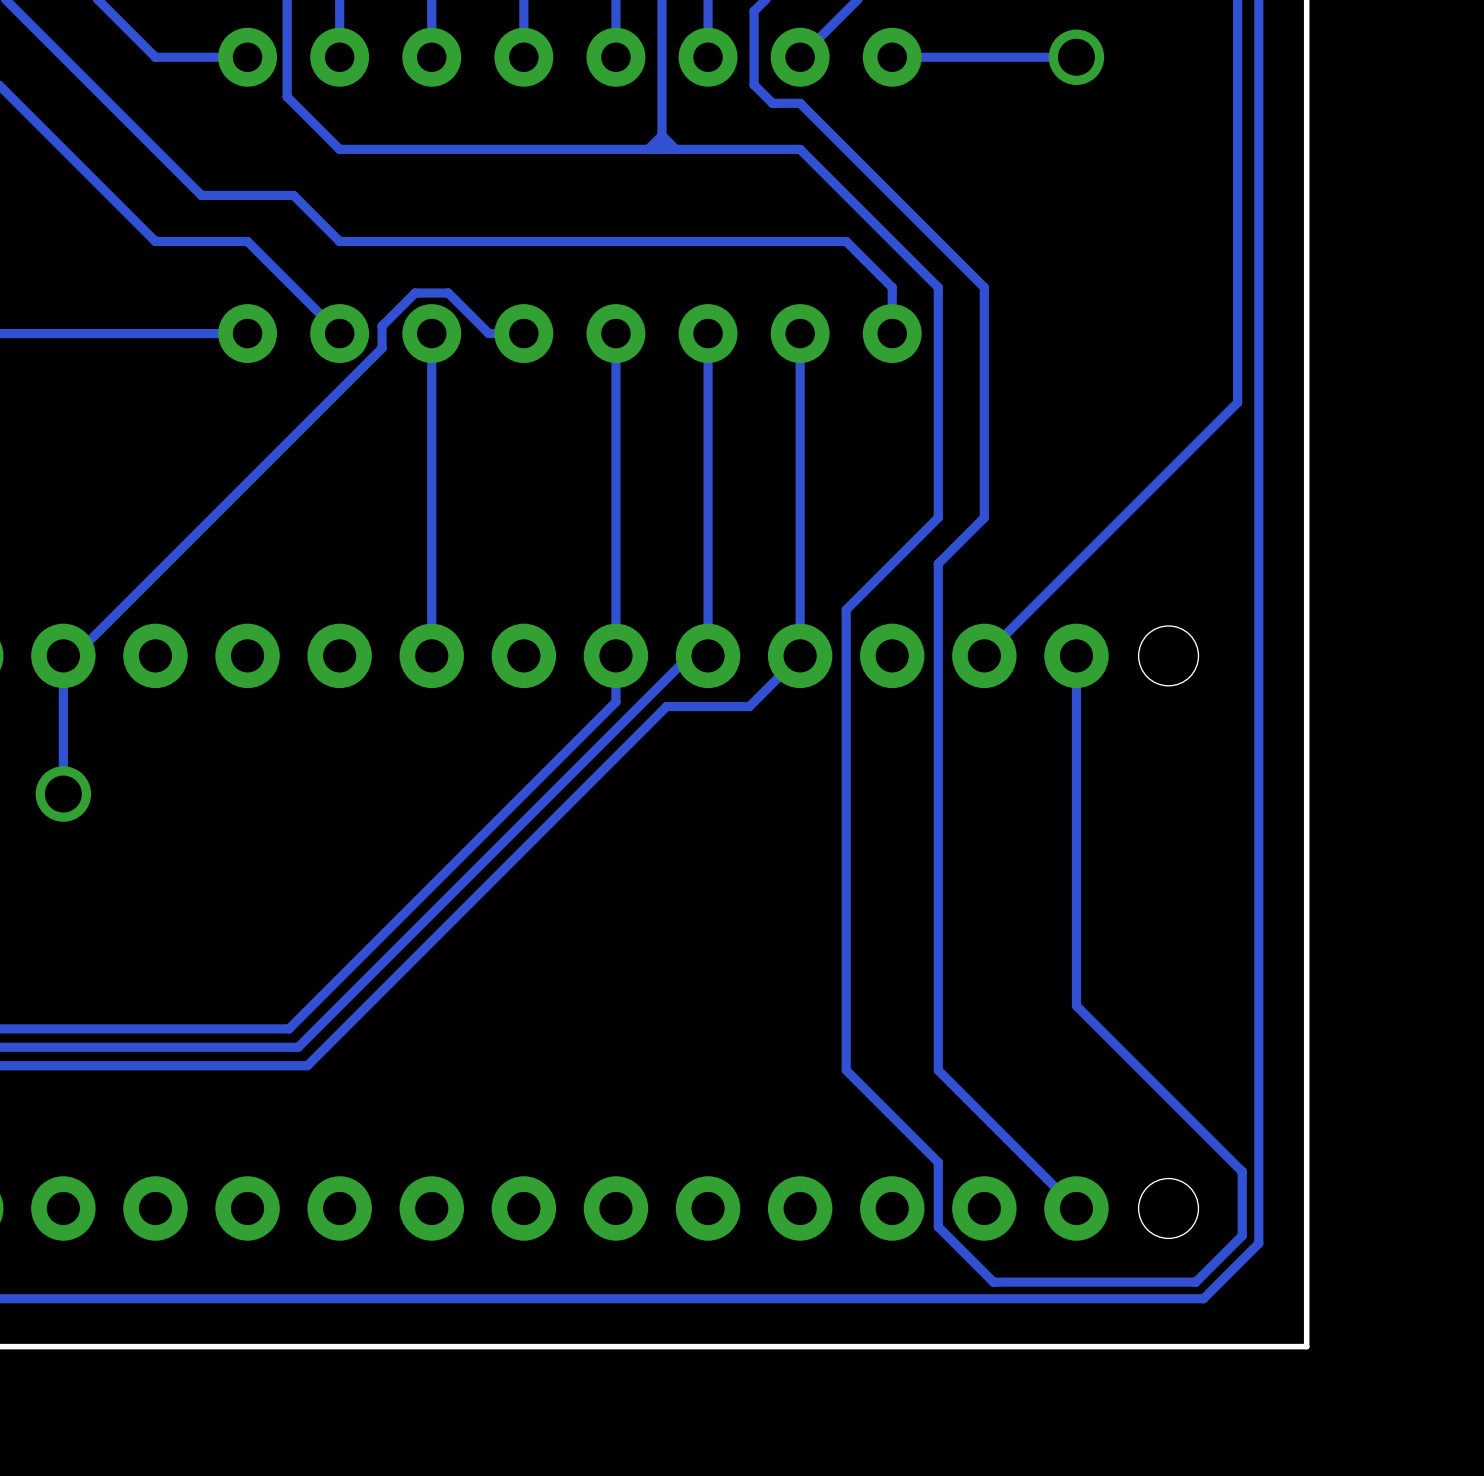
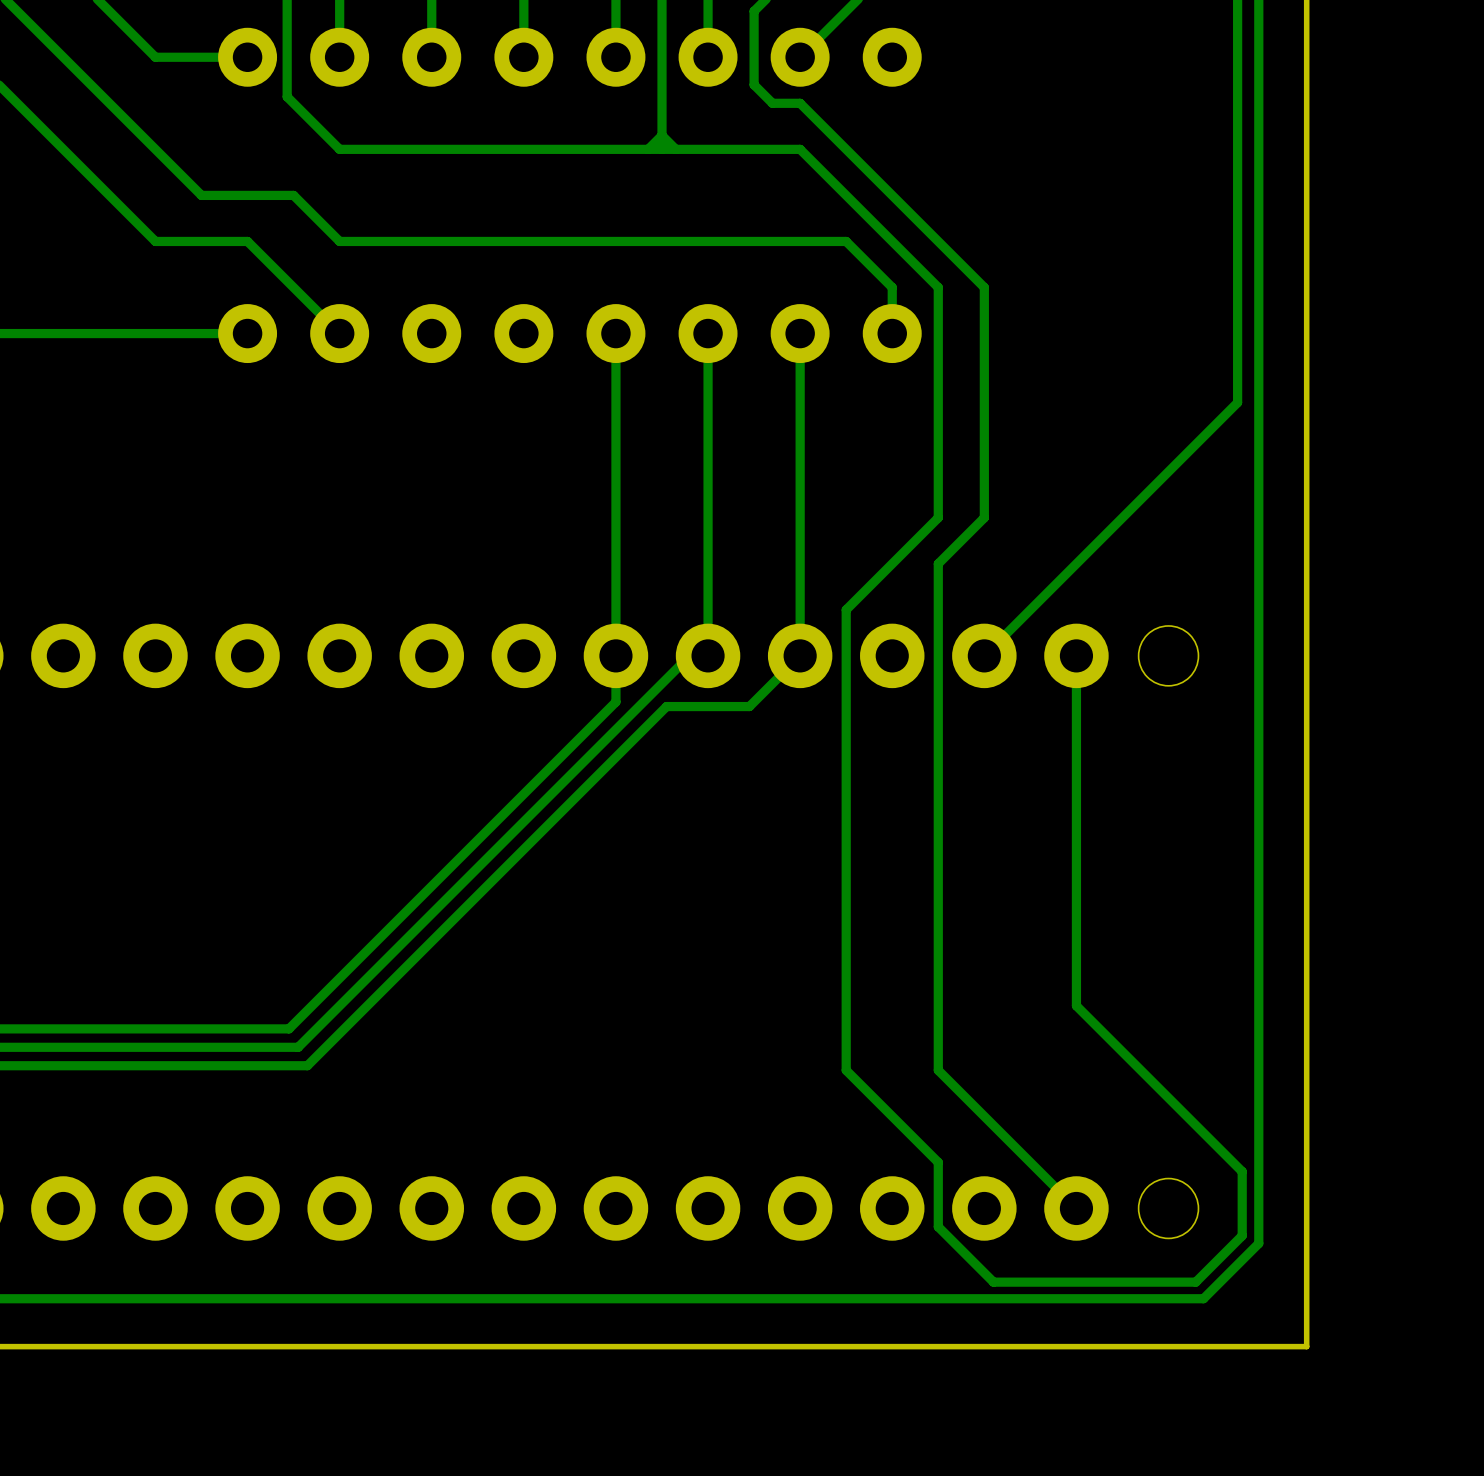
track: (1076, 57) (892, 57) -> none
via: (1076, 57) -> none
track: (431, 333) (431, 655) -> none
track: (523, 333) (488, 333) (448, 293) (415, 293) (382, 326) (382, 348) (76, 654) (65, 654) (63, 655) (63, 794) -> none
via: (63, 794) -> none

